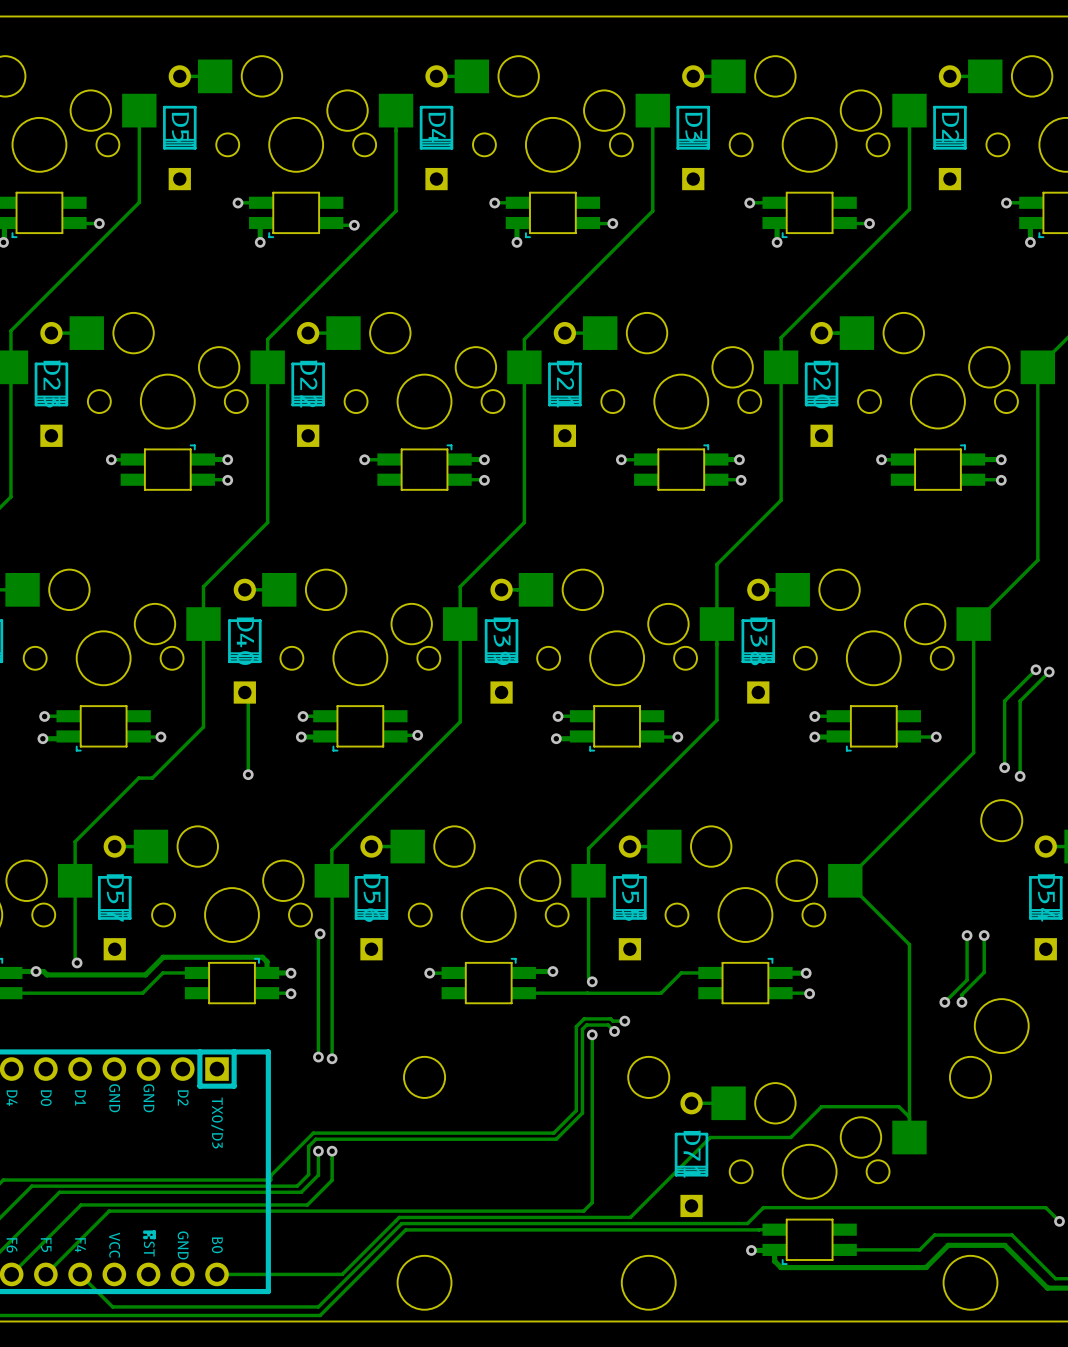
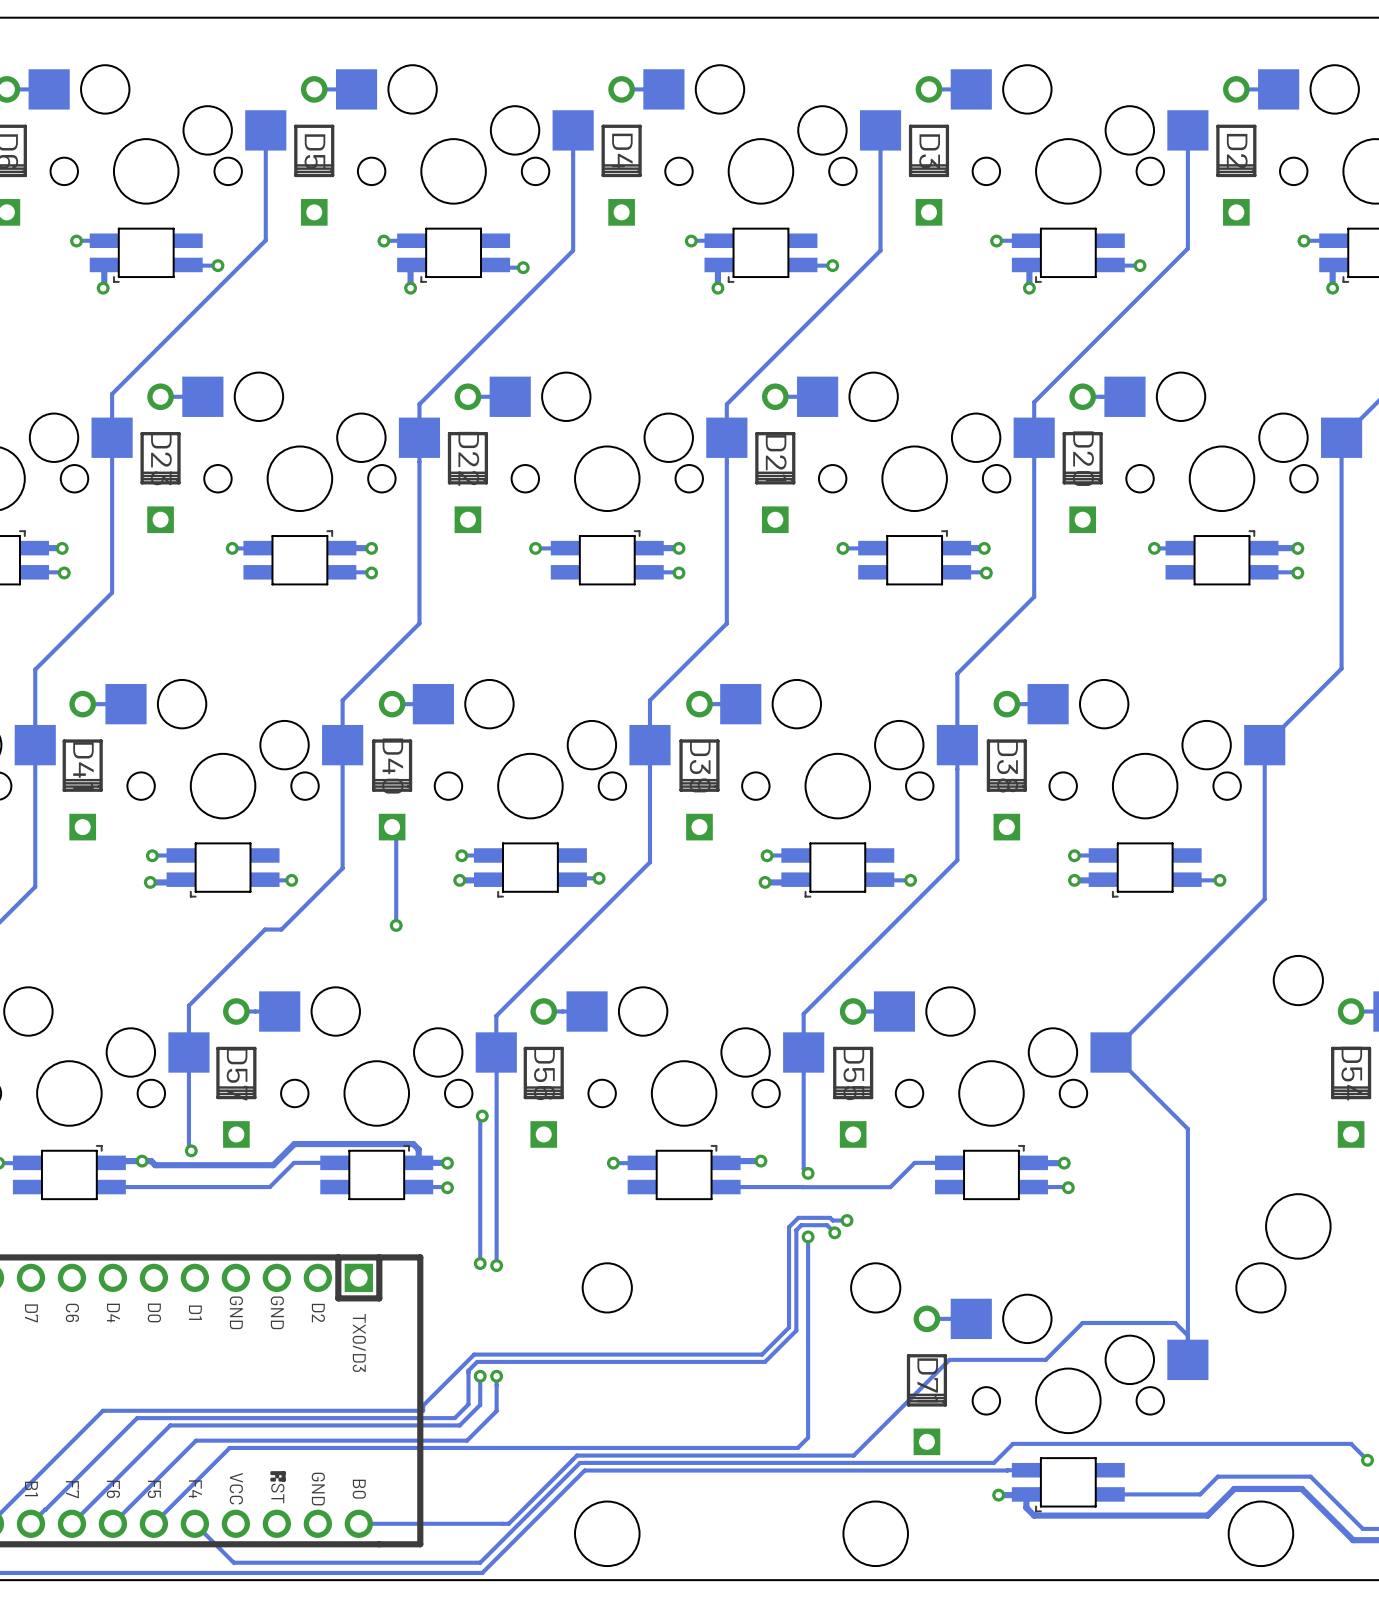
track: (1035, 669) (1004, 701) (1004, 767) -> none
via: (1035, 669) -> none
track: (1049, 671) (1020, 701) (1020, 776) -> none
via: (1049, 671) -> none
via: (1004, 767) -> none
via: (1020, 776) -> none
track: (967, 935) (967, 980) (944, 1002) -> none
via: (967, 935) -> none
track: (984, 935) (984, 972) (961, 994) (961, 1002) -> none
via: (984, 935) -> none
via: (944, 1002) -> none
via: (961, 1002) -> none

